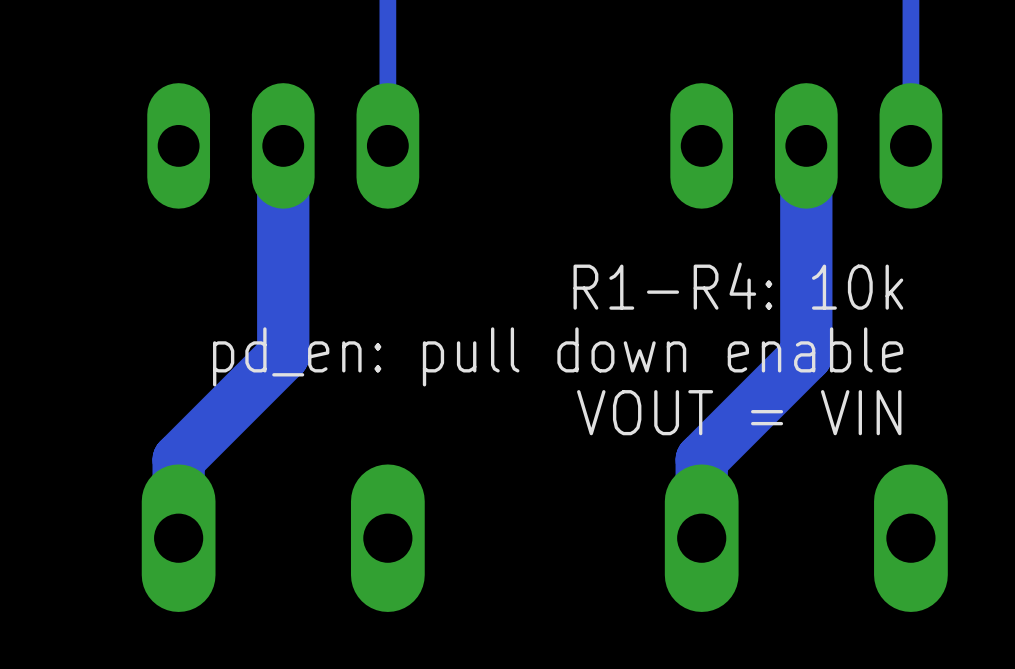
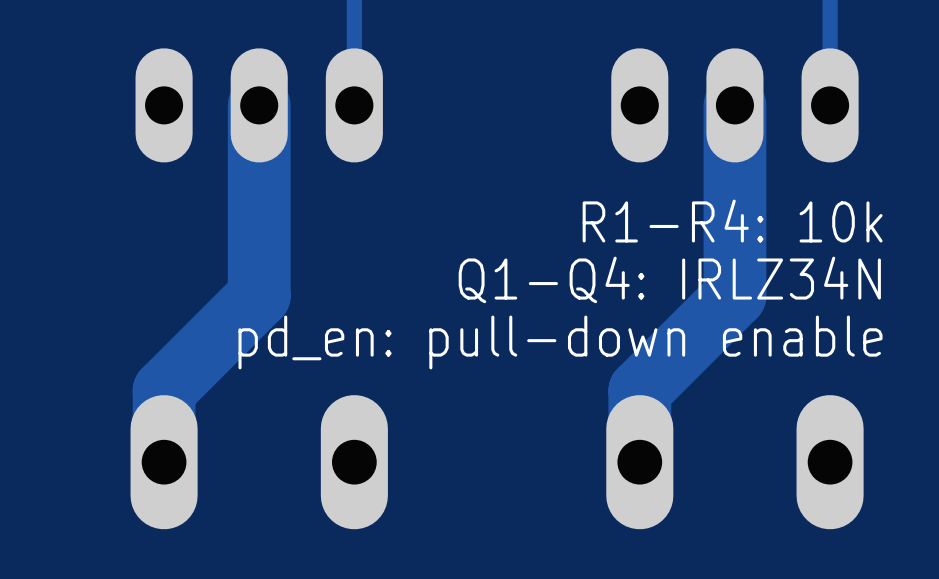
track width: thin (283, 145) (283, 355) (178, 459) (178, 538) -> thick (259, 105) (259, 295) (164, 390) (164, 462)
track width: thin (806, 145) (806, 355) (701, 459) (701, 538) -> thick (734, 105) (734, 295) (639, 390) (639, 462)
text position: R1-R4: 10k (738, 286) -> R1-R4: 10k (732, 221)
text: none -> Q1-Q4: IRLZ34N (669, 279)
text: pd_en: pull down enable (558, 356) -> pd_en: pull-down enable (560, 342)
text: VOUT = VIN (739, 412) -> none

